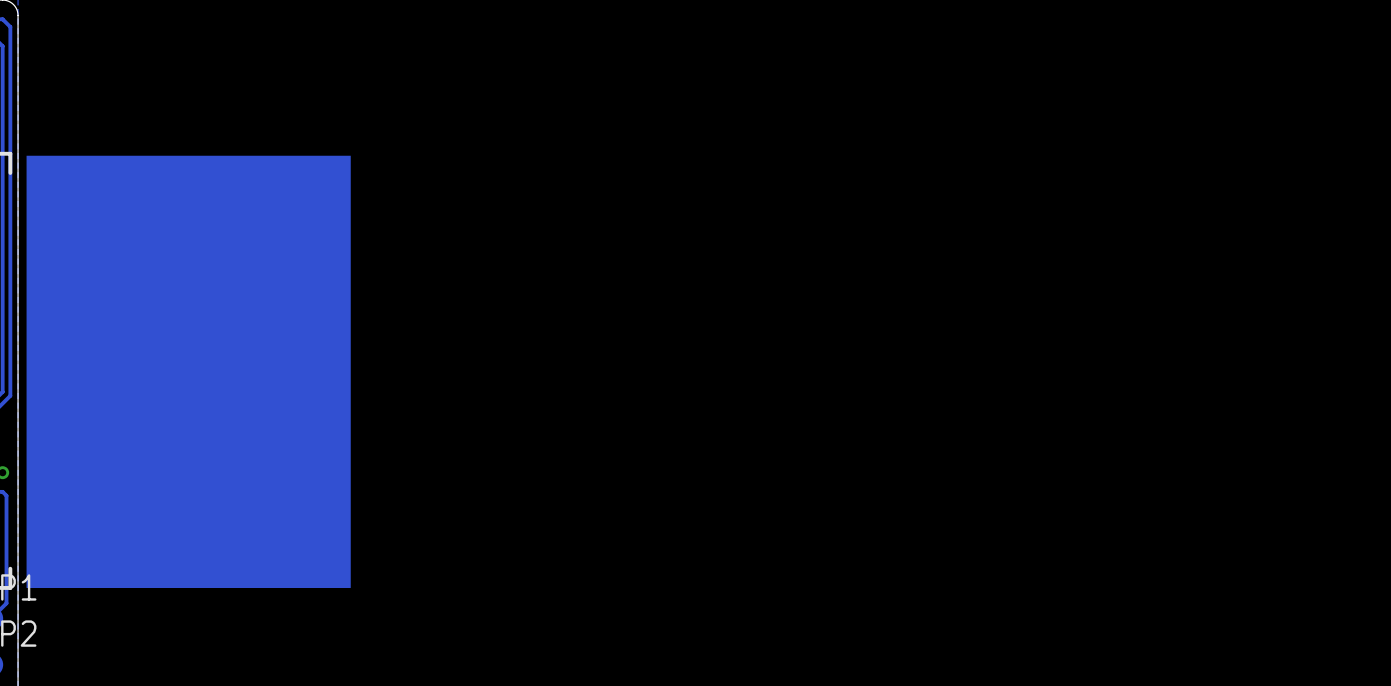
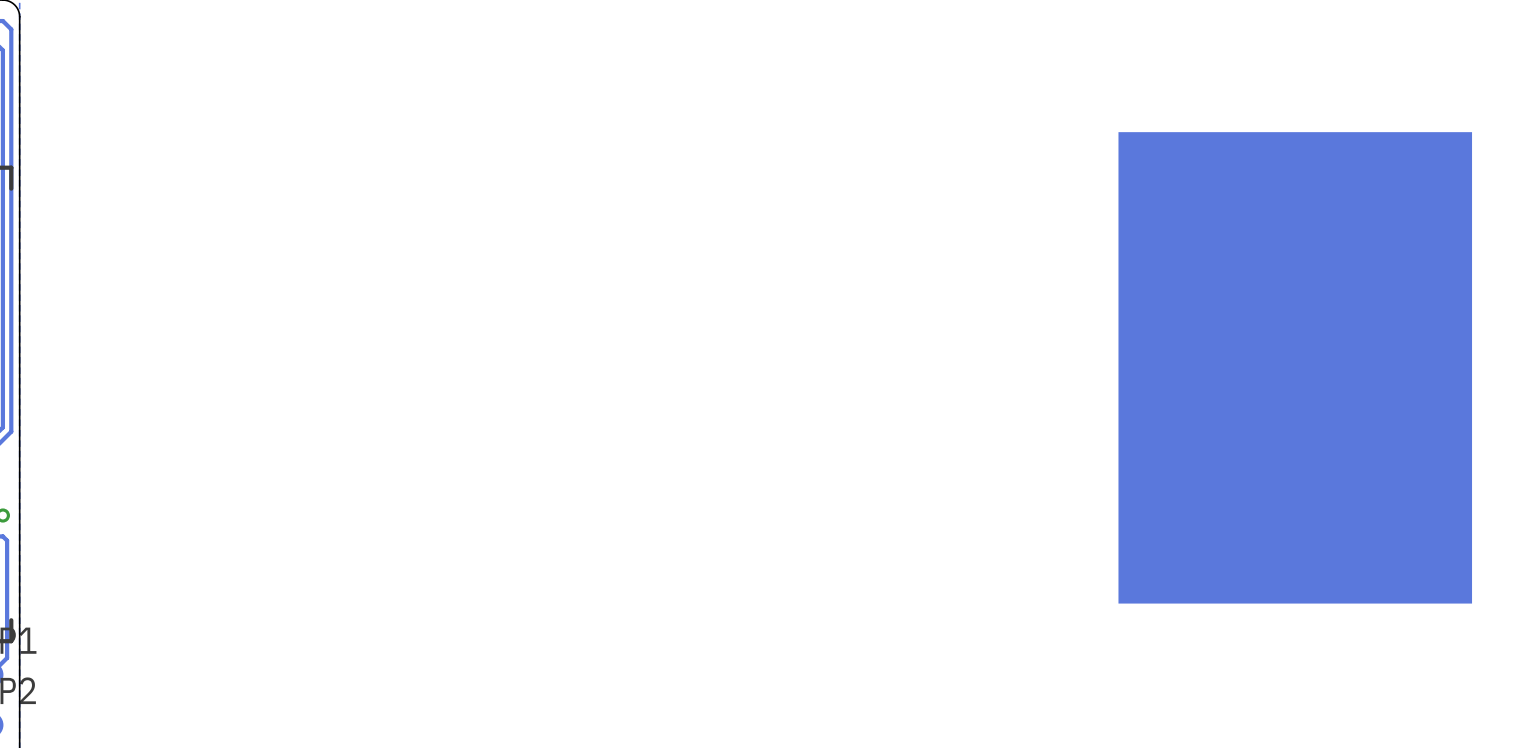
drawing: none -> [1118, 132, 1473, 604]
drawing: [26, 155, 351, 588] -> none

